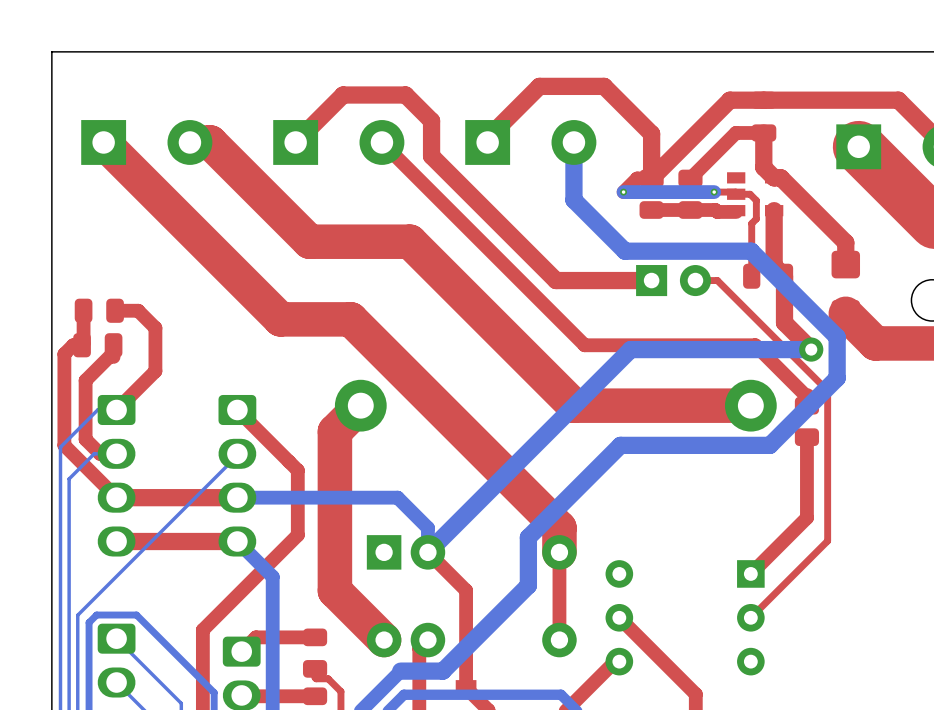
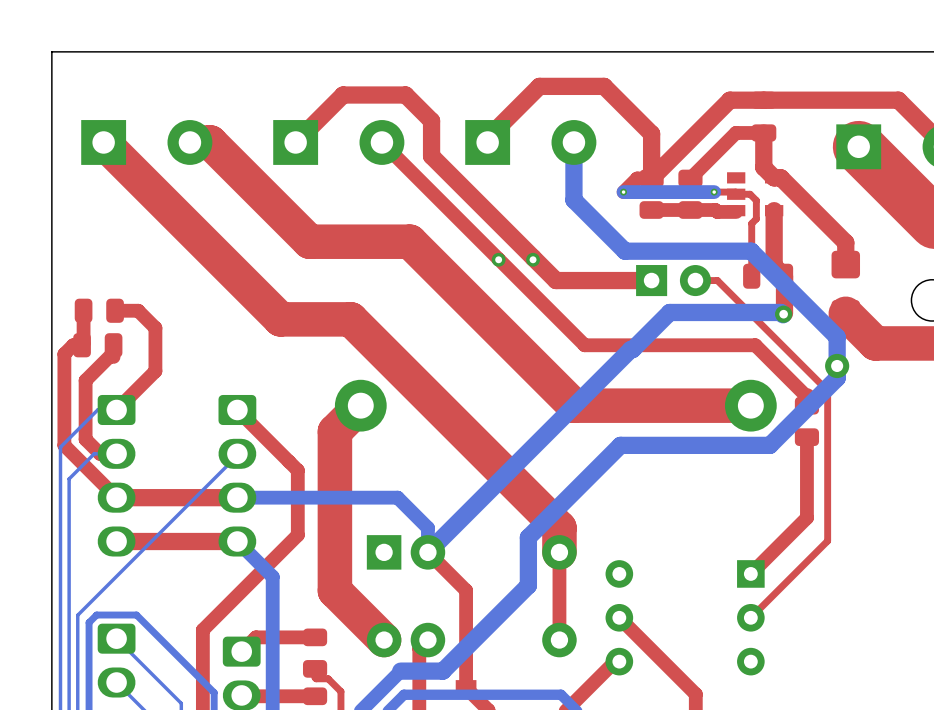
via: none -> (498, 259)
via: none -> (533, 259)
top track: (784, 313) (784, 322) (811, 349) -> none
via: none -> (783, 314)
bottom track: (810, 349) (632, 349) -> (783, 314) (780, 312) (669, 312) (632, 349)
via position: (811, 349) -> (837, 365)

